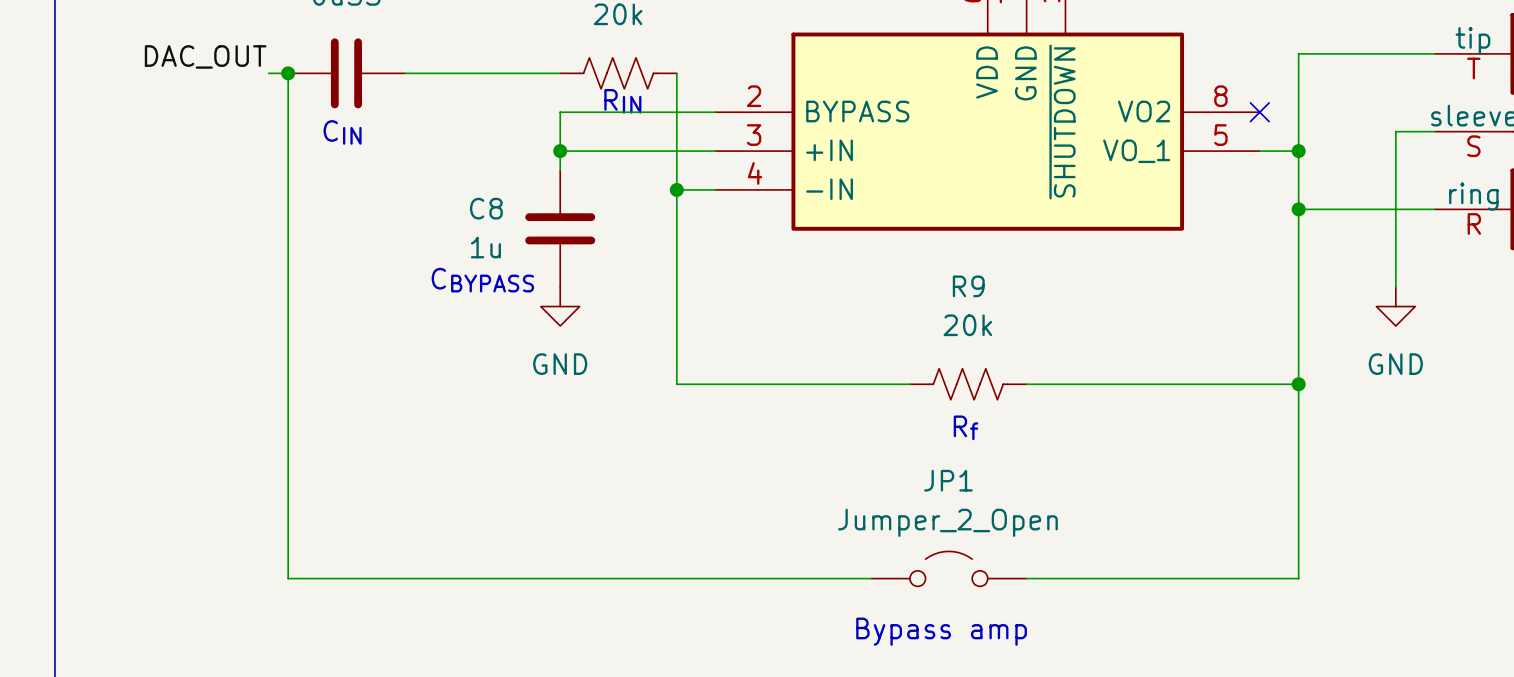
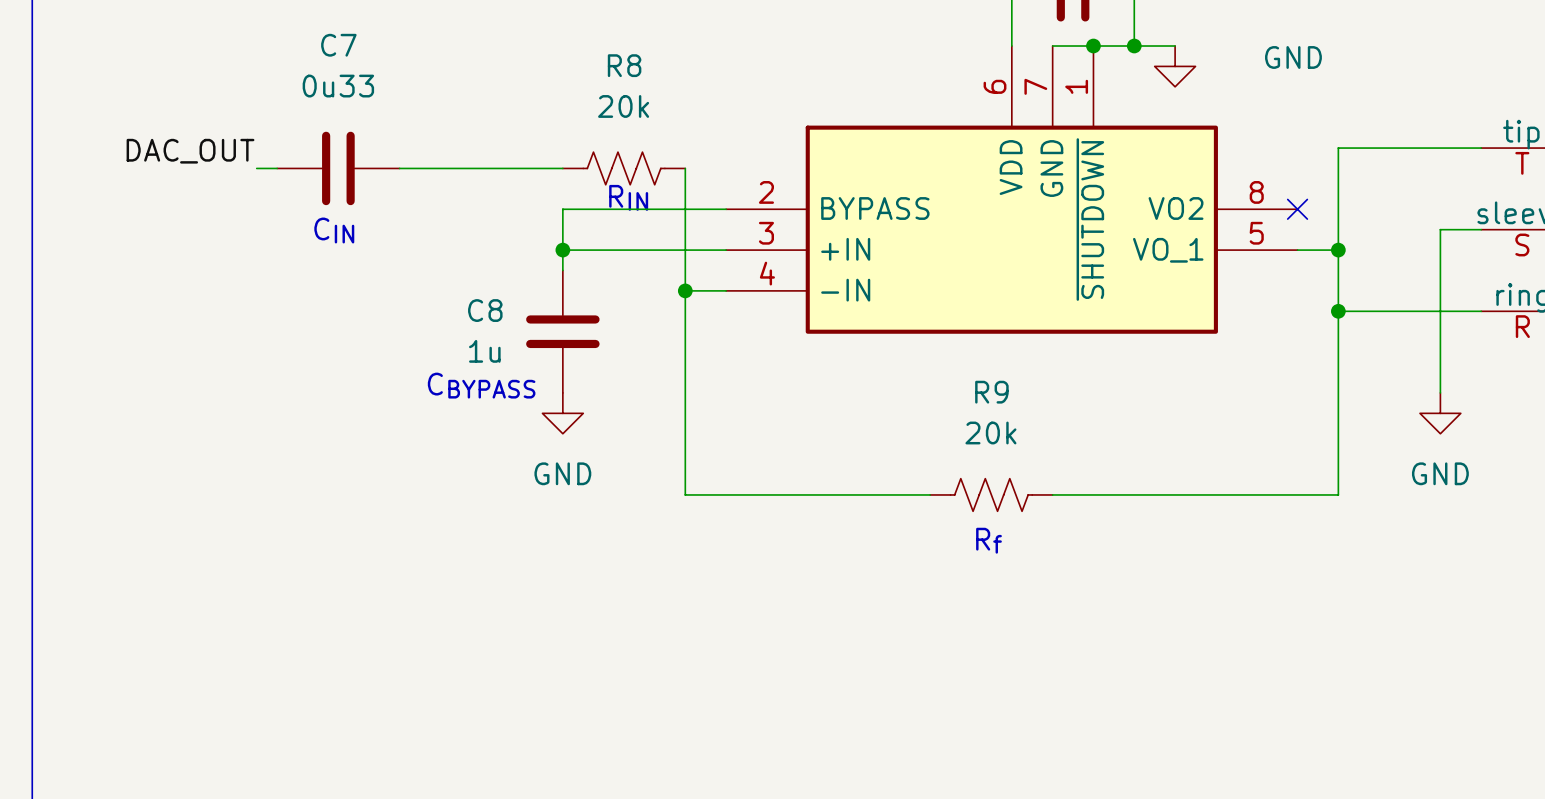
wire: (288, 73) (288, 578) (871, 578) -> none
junction: (288, 73) -> none
wire: (1298, 384) (1298, 578) (1026, 578) -> none
junction: (1298, 384) -> none
JP1: Jumper_2_Open (948, 568) -> none
text: Bypass amp (941, 631) -> none

